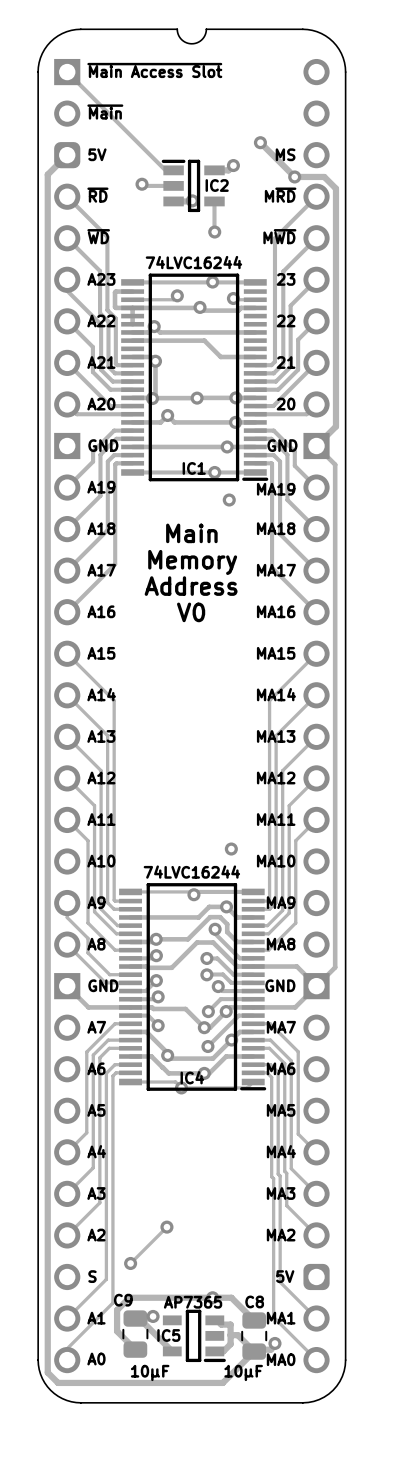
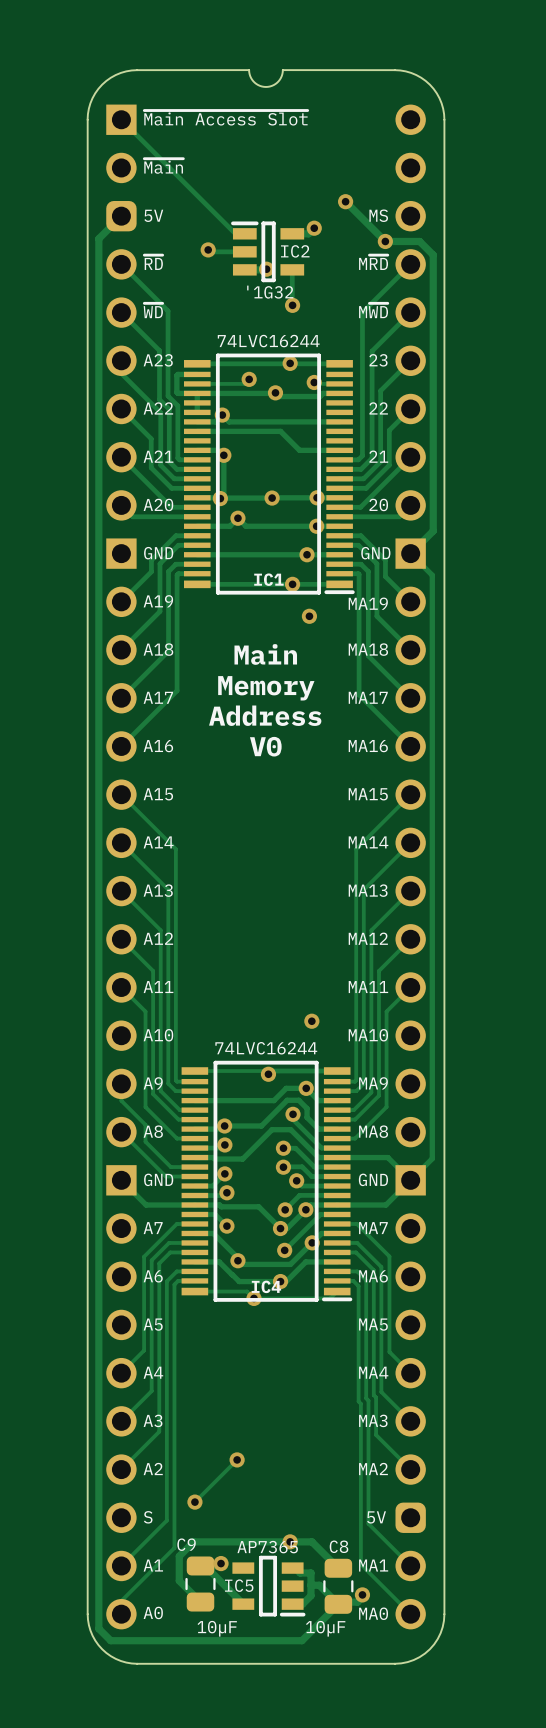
IC2 text: none -> '1G32 (270, 292)

